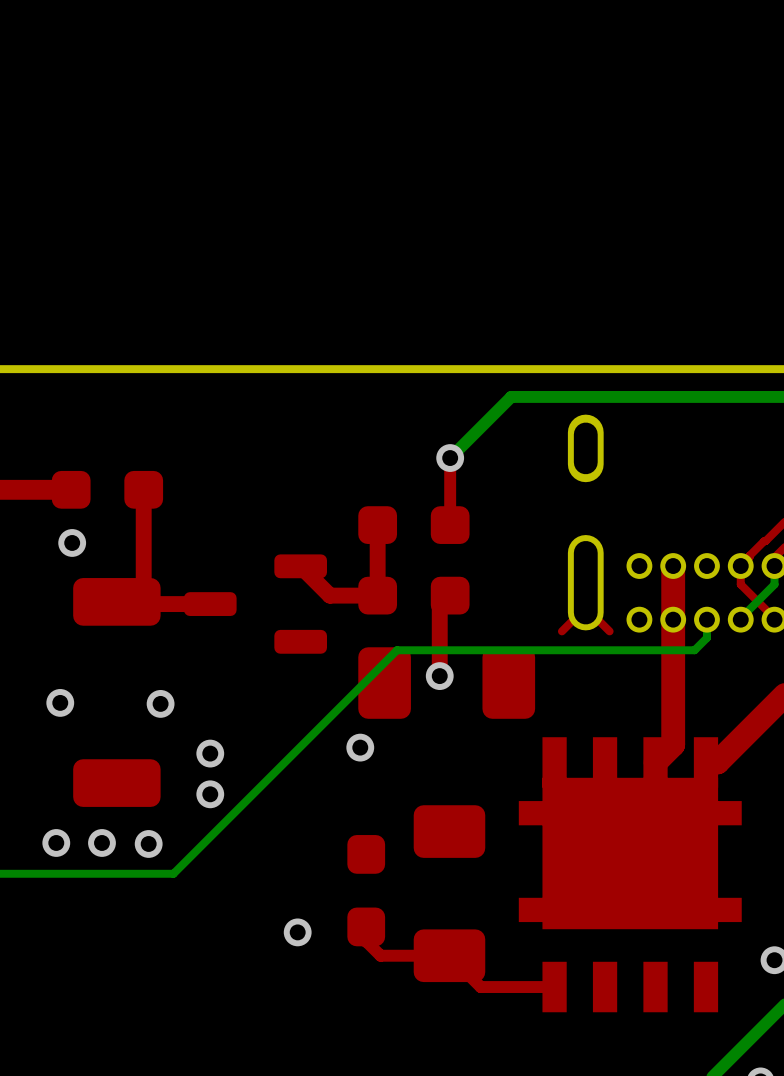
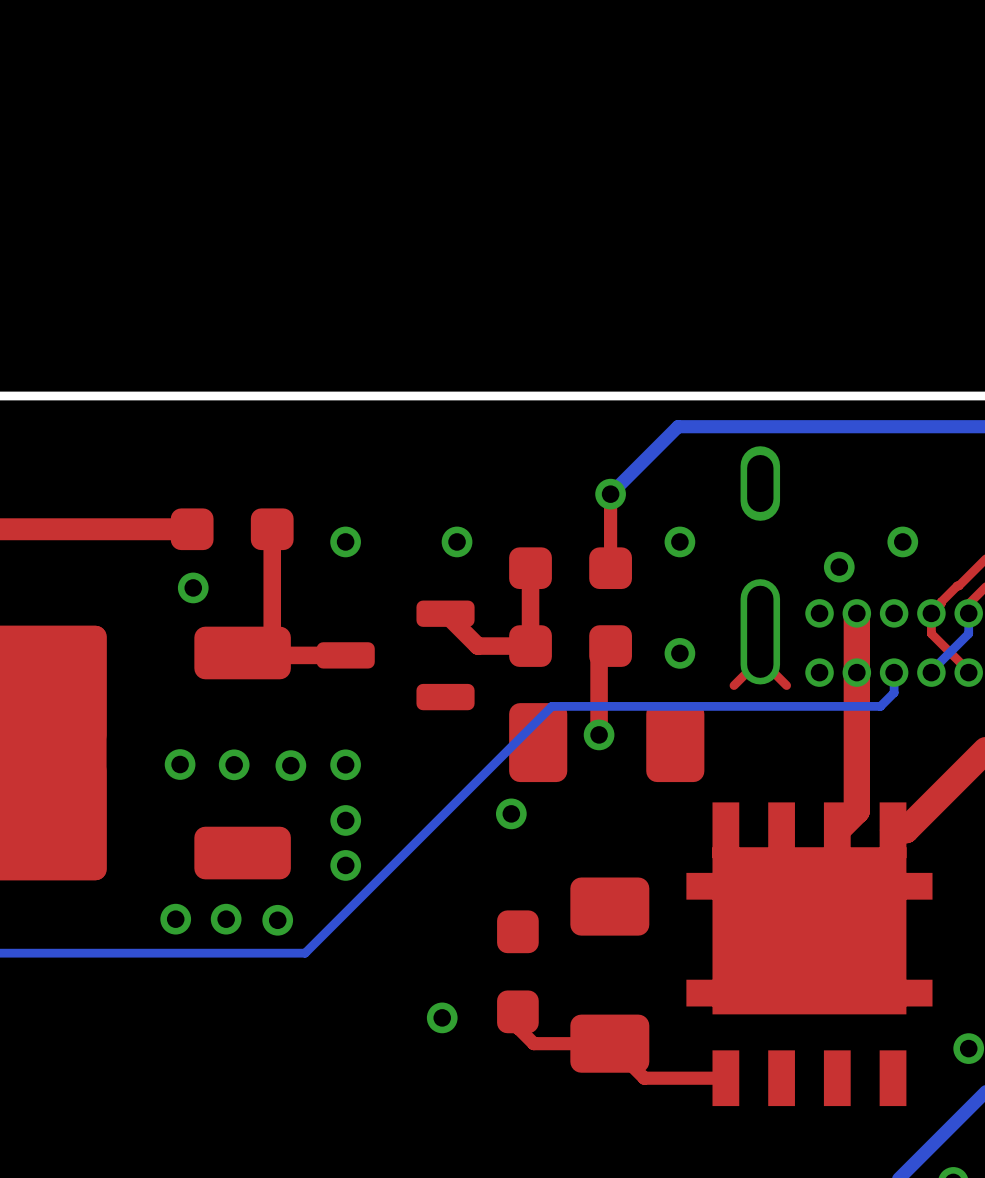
via: none -> (345, 541)
via: none -> (457, 541)
via: none -> (679, 541)
via: none -> (902, 541)
via: none -> (839, 567)
via: none -> (679, 653)
via: none -> (234, 764)
via: none -> (345, 764)

